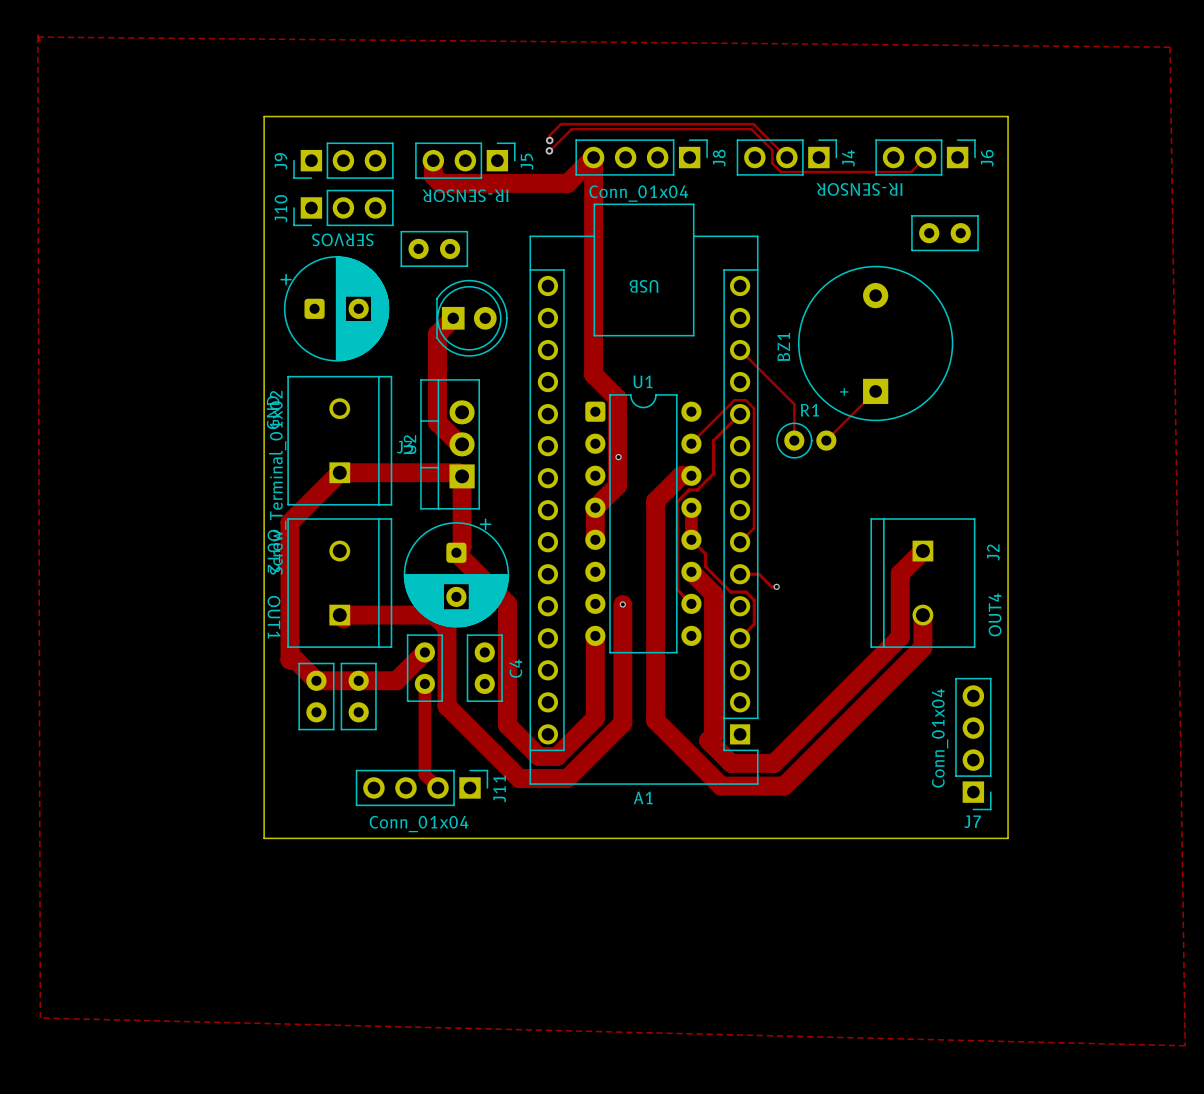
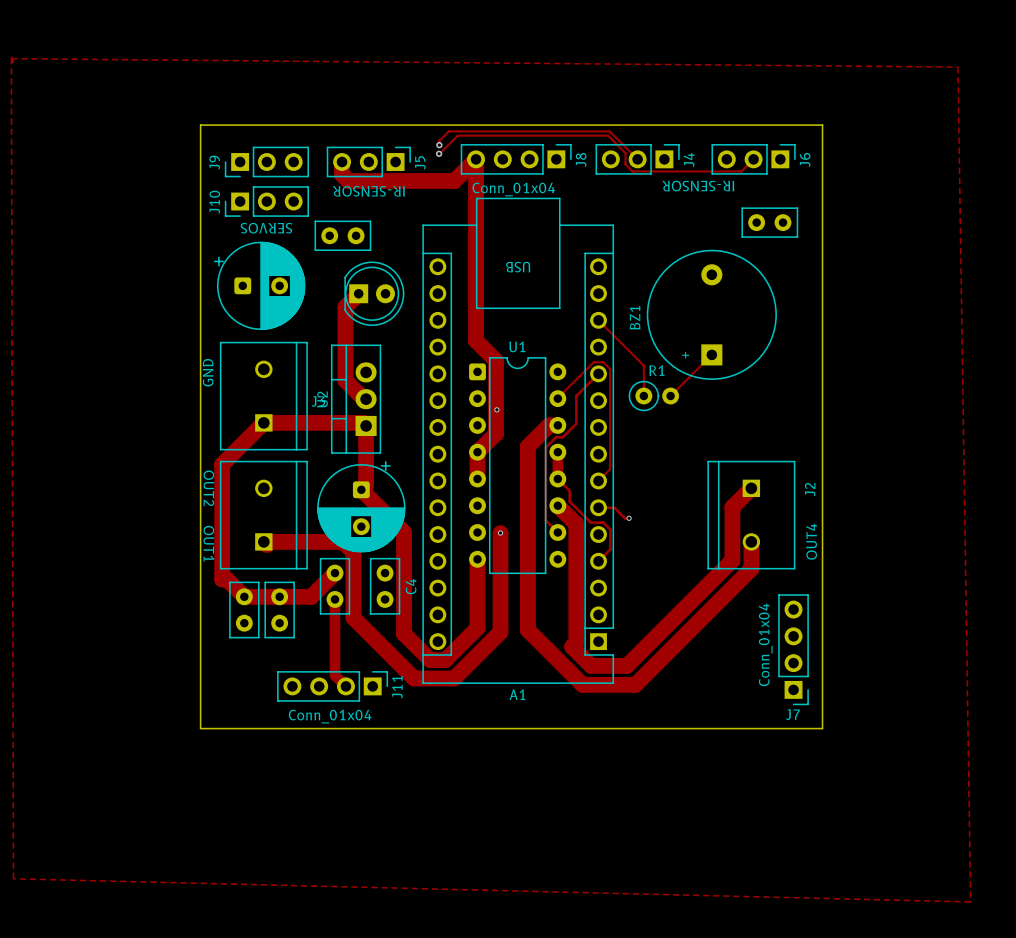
J3 value: Screw_Terminal_01x02 (277, 482) -> none

